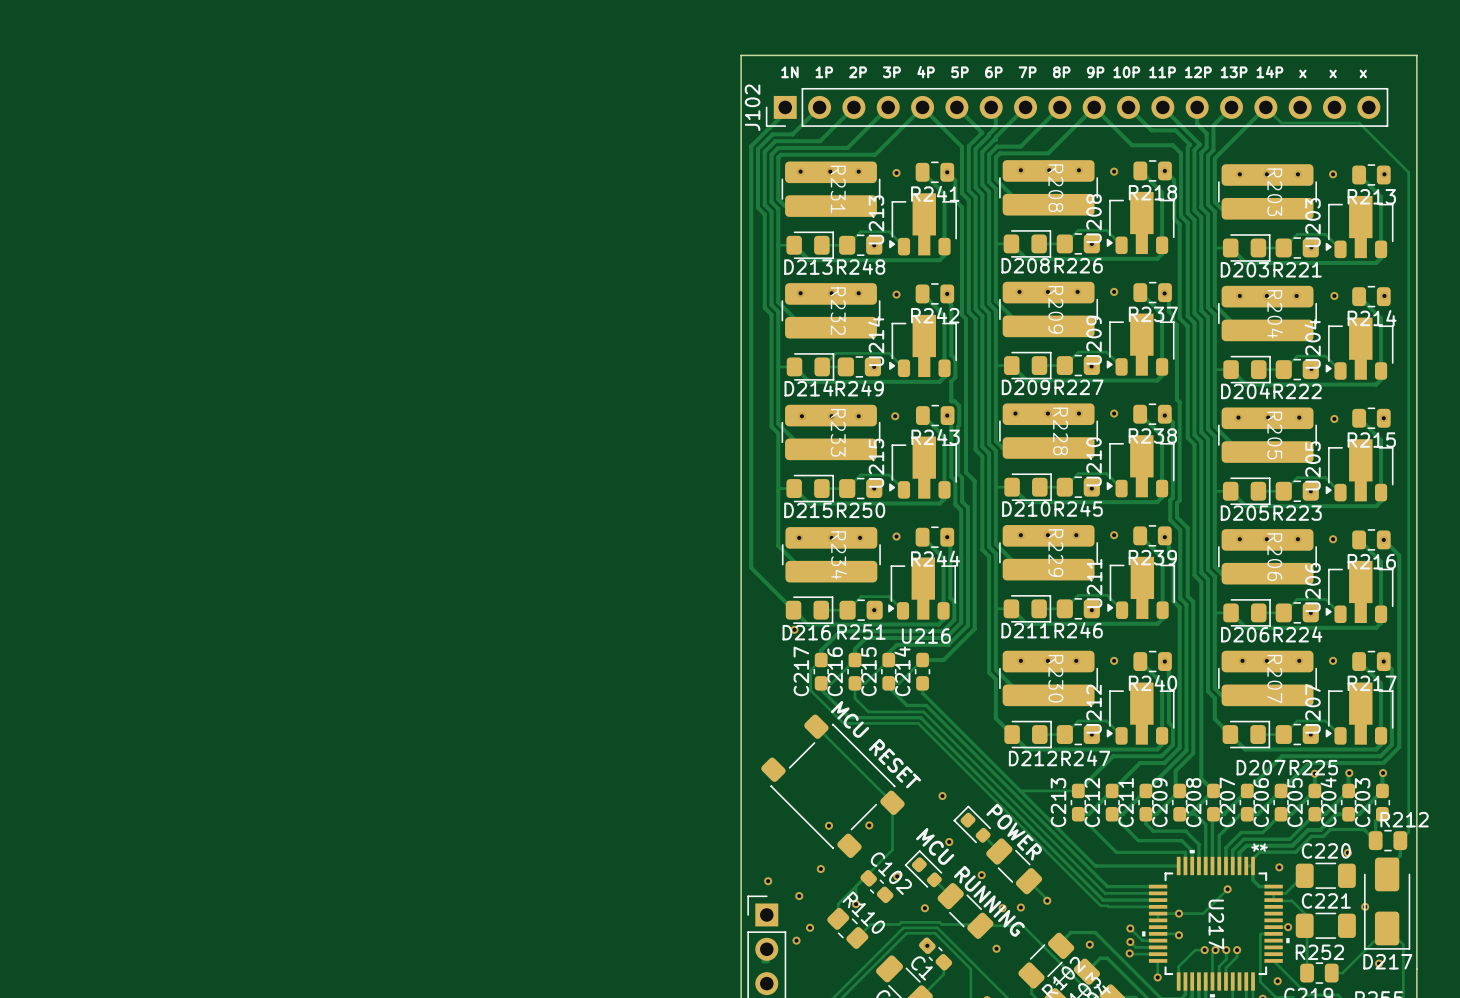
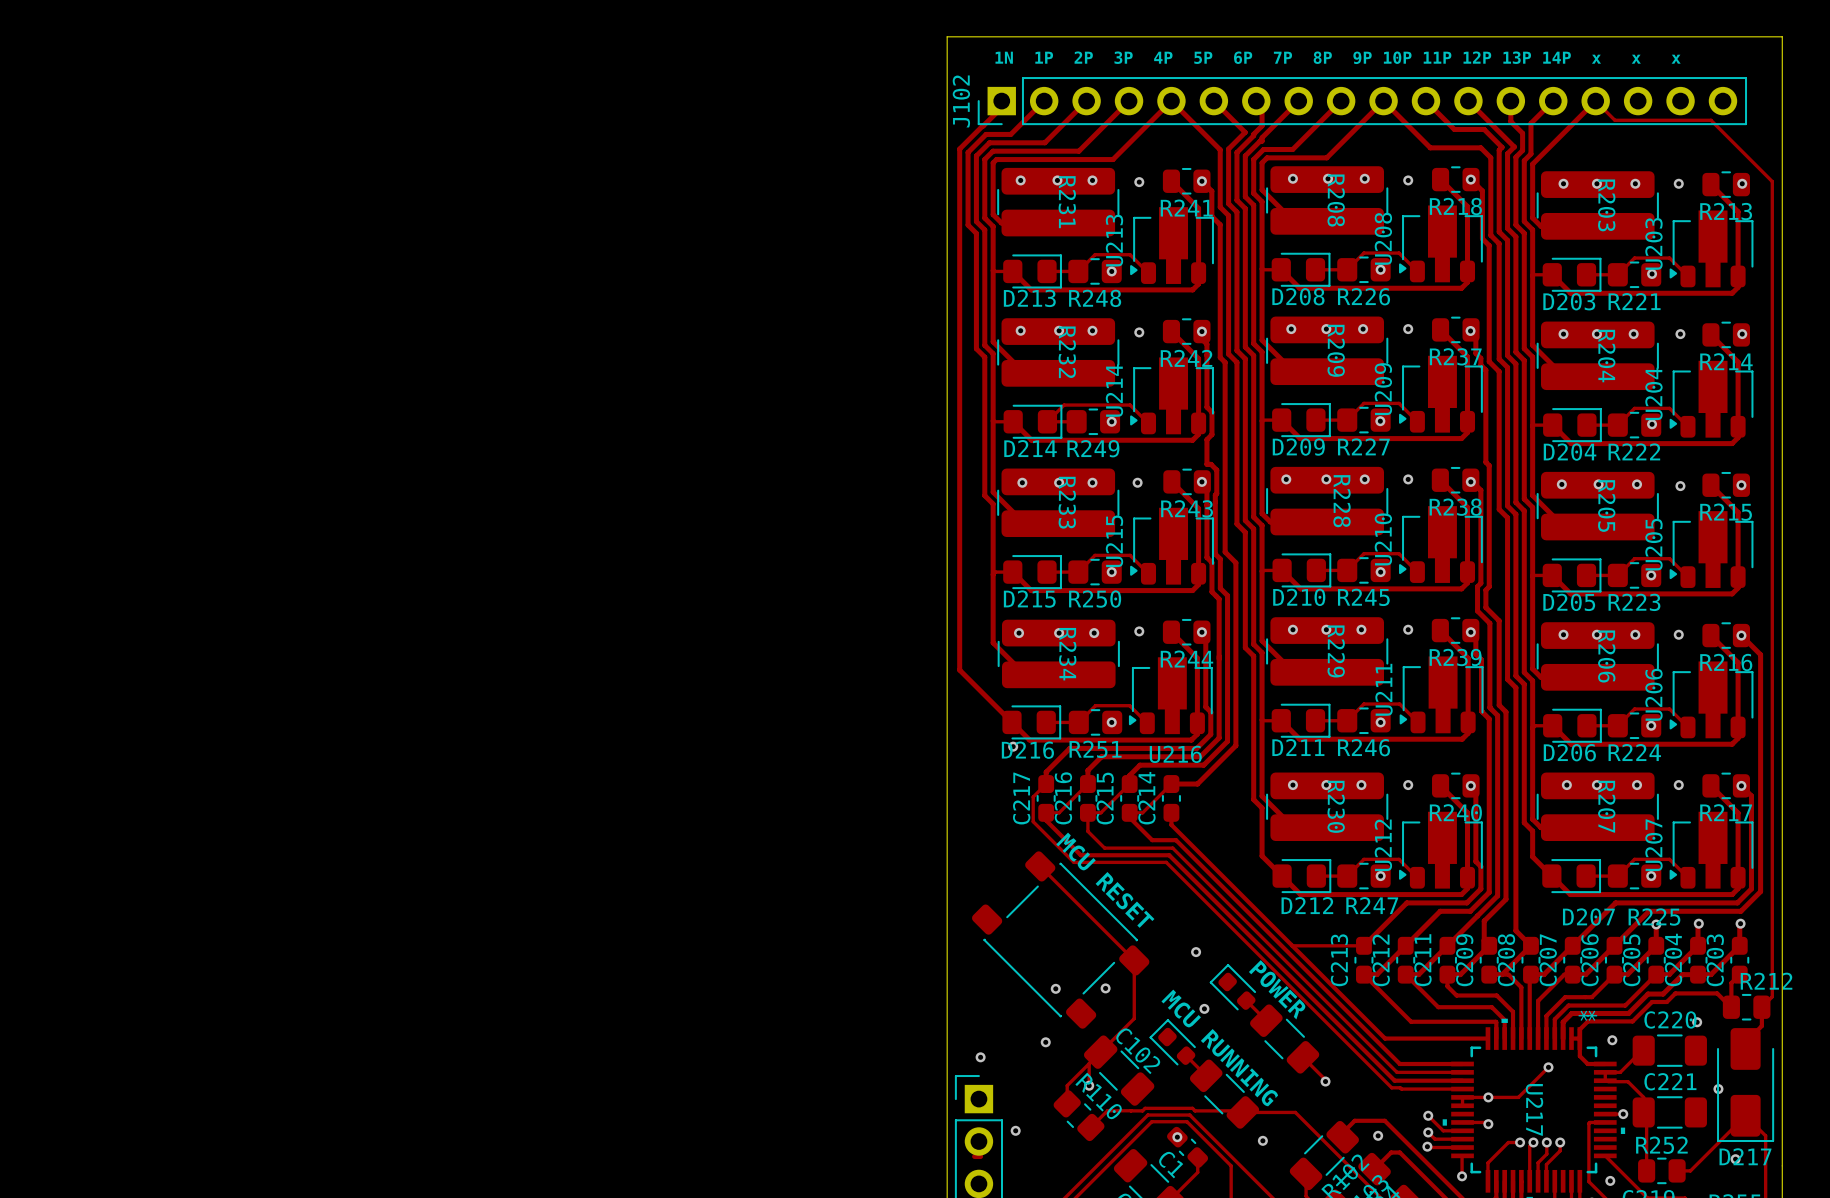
C102 footprint: [860, 869, 894, 904] -> [1083, 1035, 1155, 1106]
via: (981, 875) -> none
via: (897, 876) -> none
via: (799, 896) -> none
via: (1020, 907) -> none
via: (924, 908) -> none
via: (1002, 908) -> none
via: (810, 927) -> none

